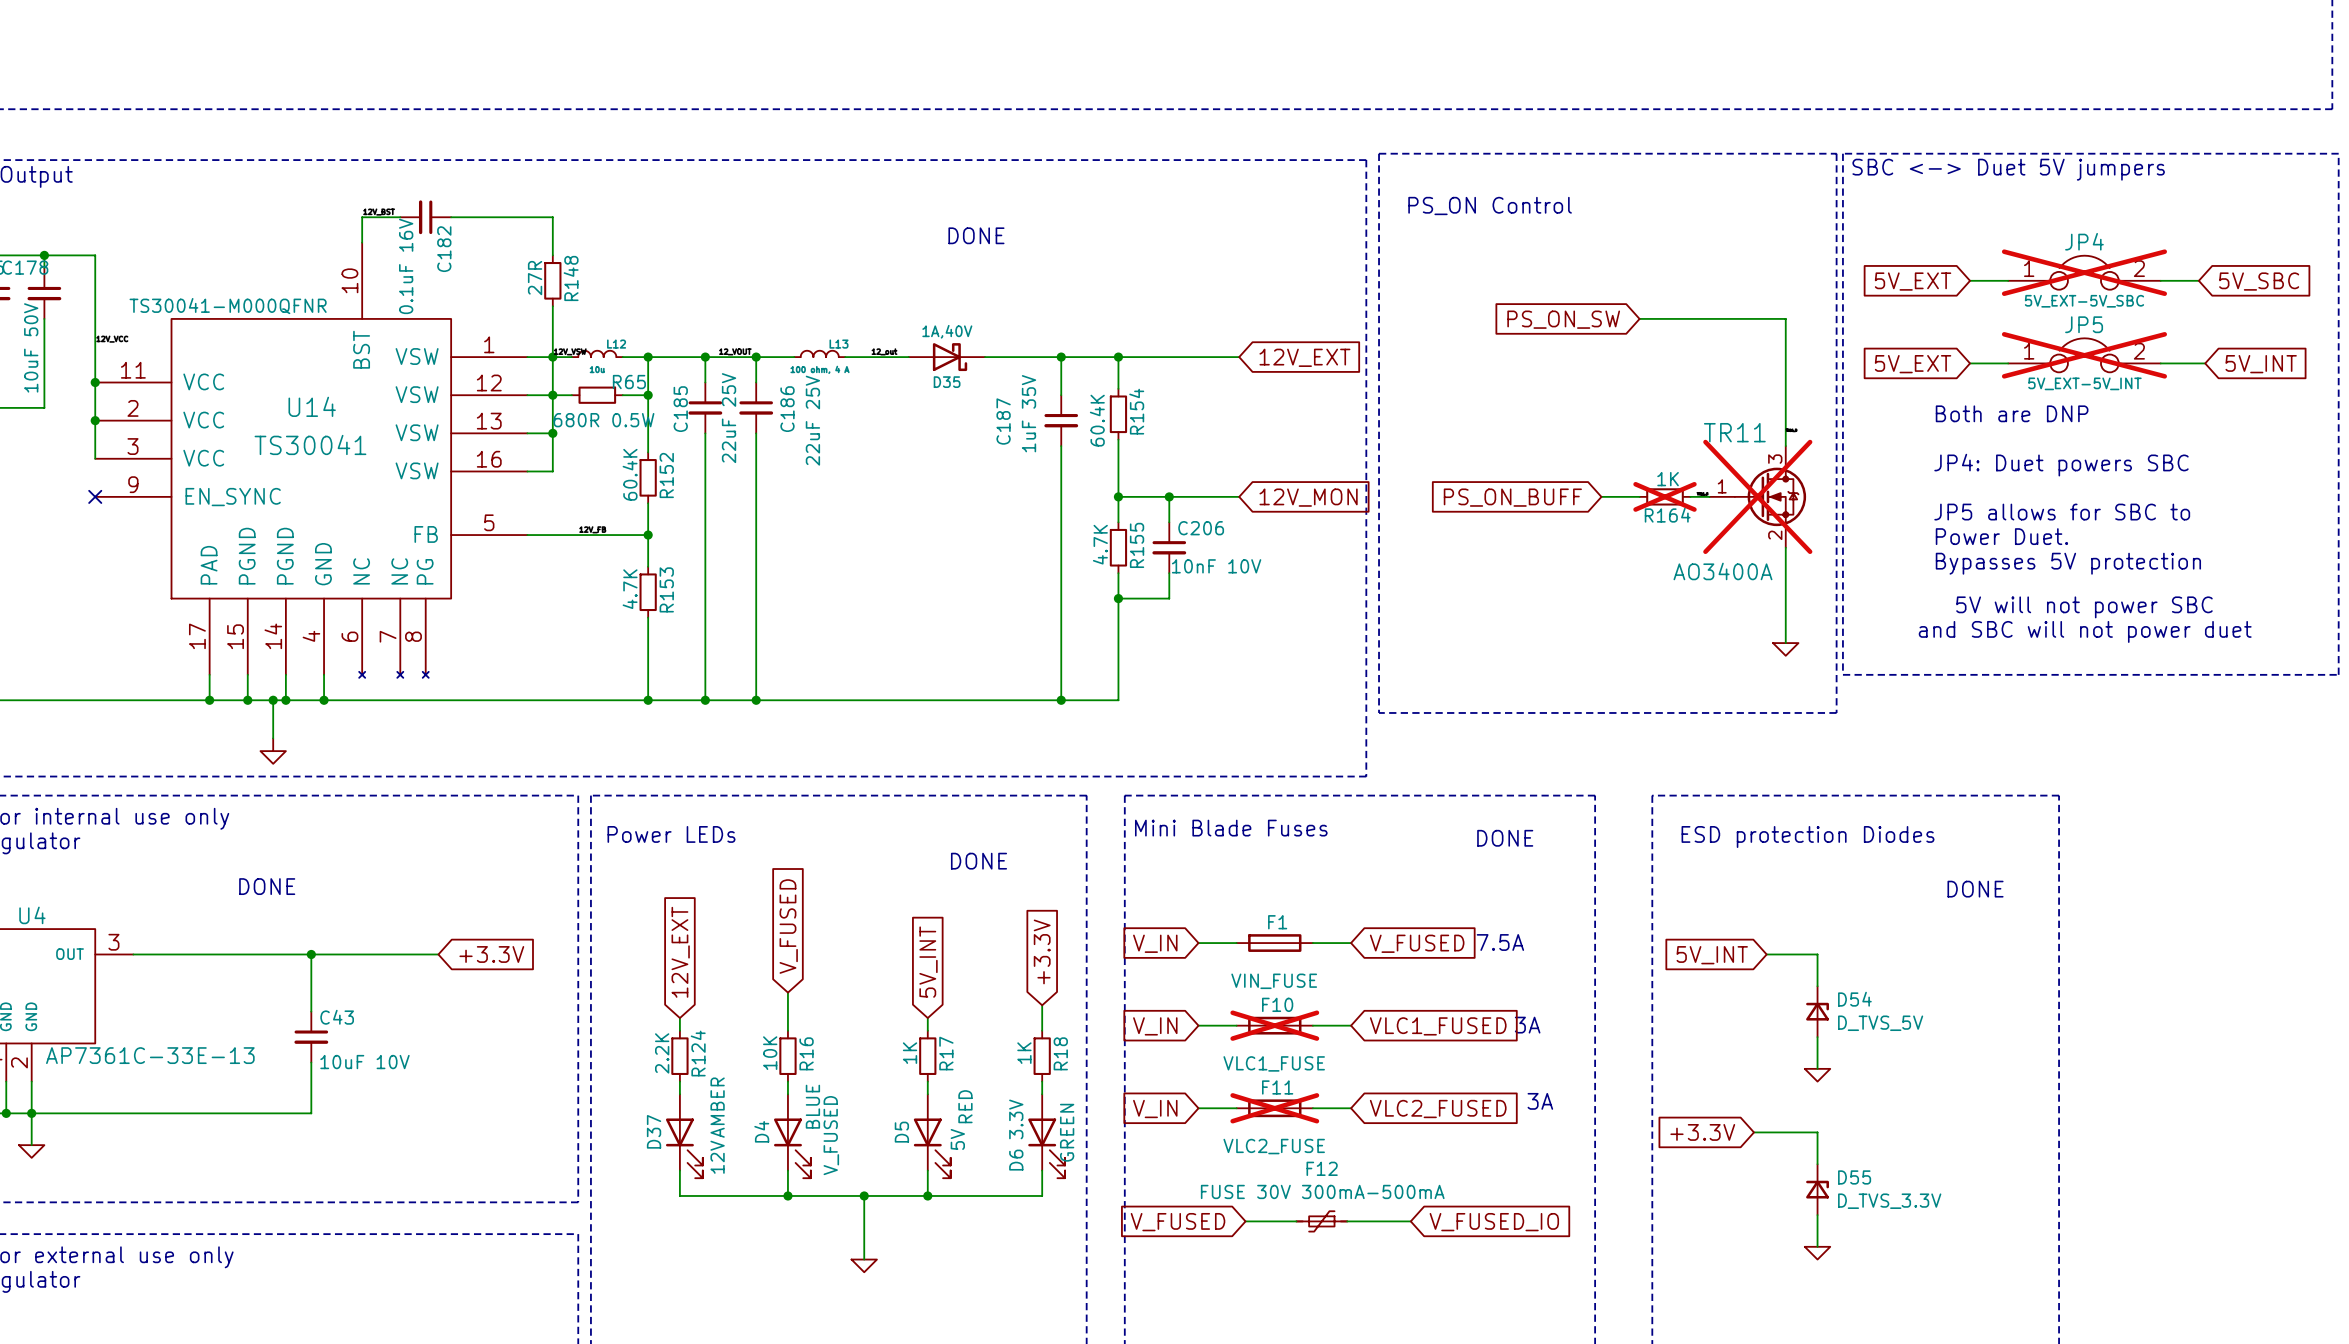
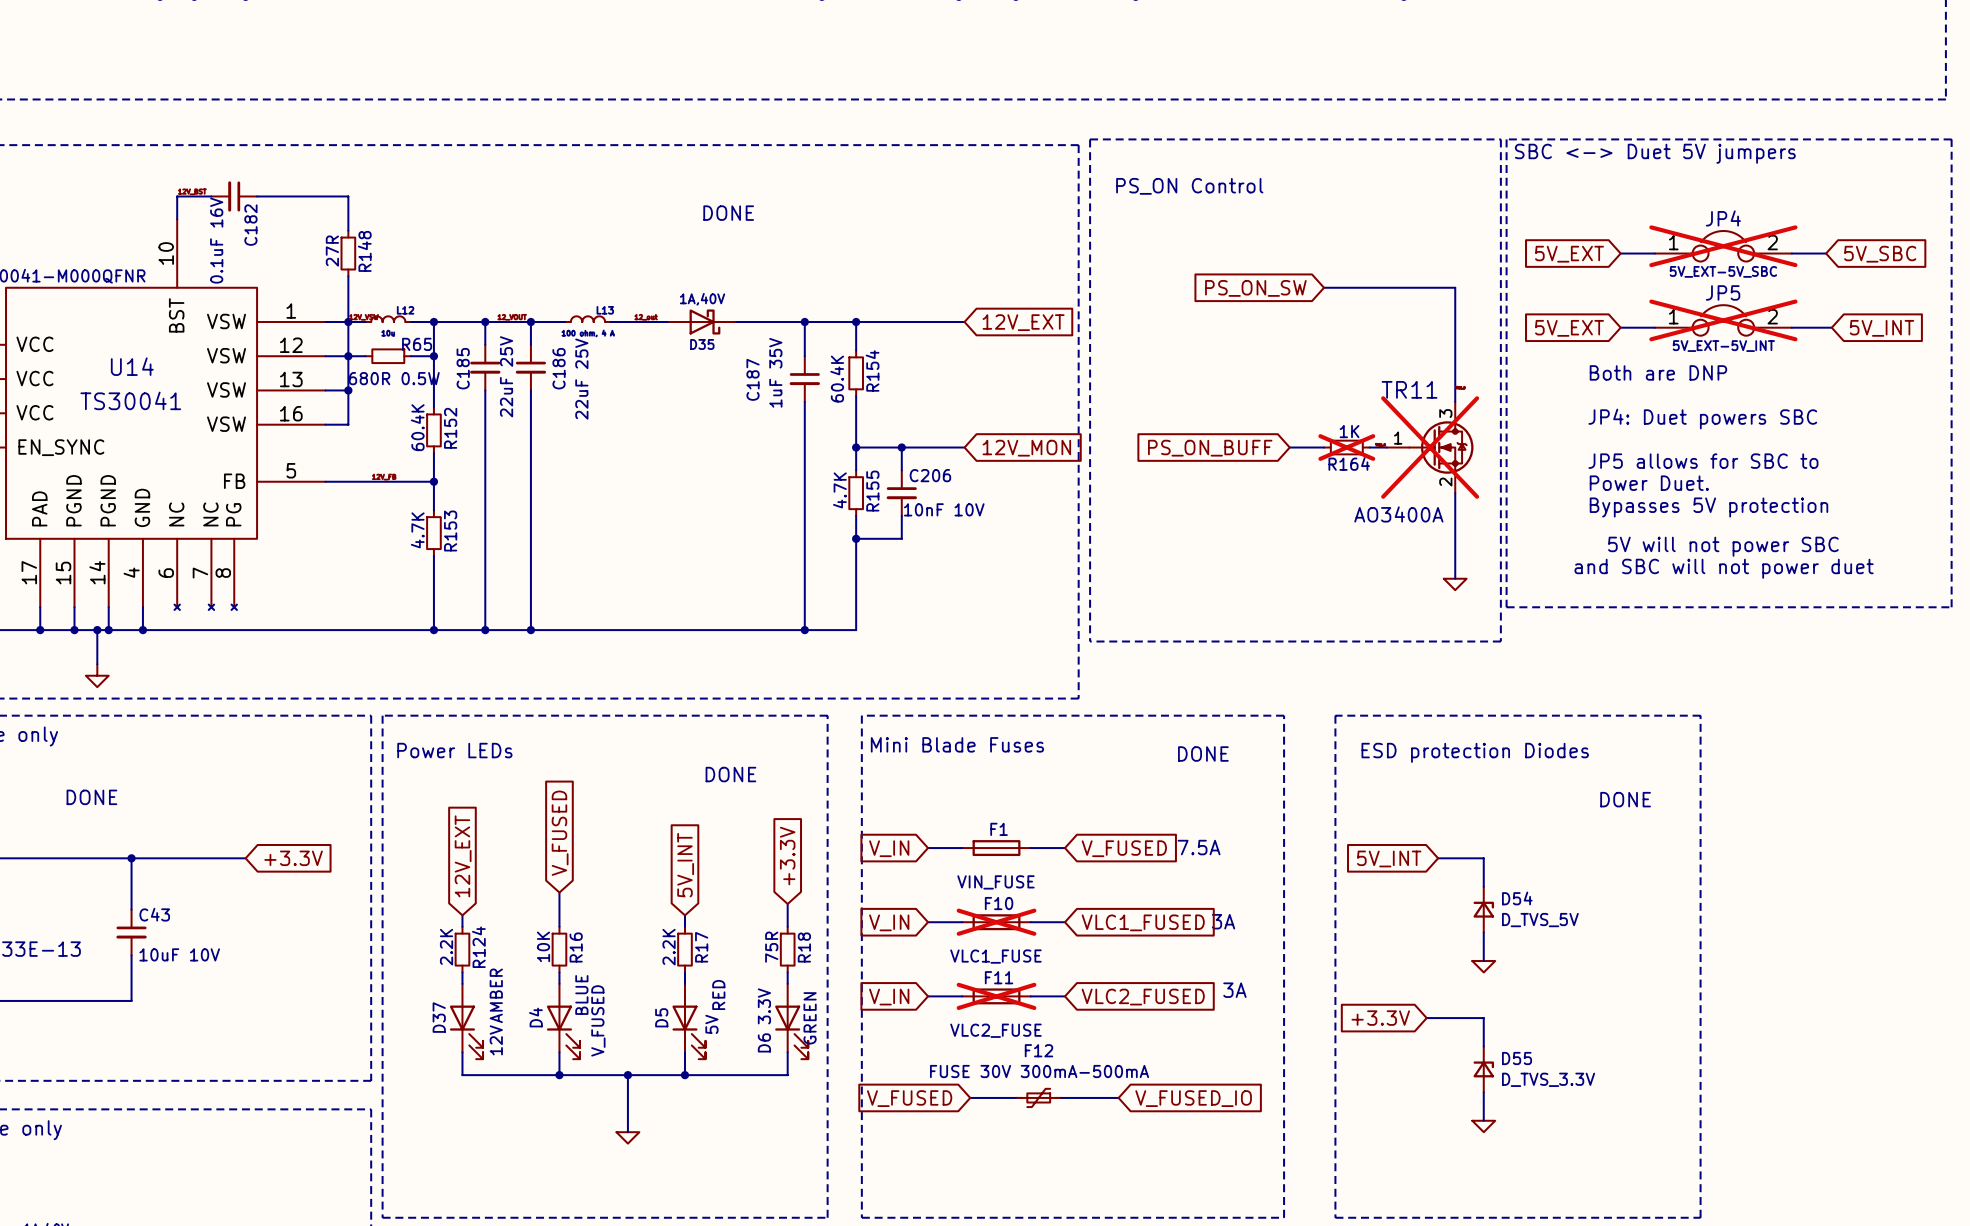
R17 value: 1K (910, 1053) -> 2.2K (669, 947)
R18 value: 1K (1024, 1053) -> 75R (771, 947)

